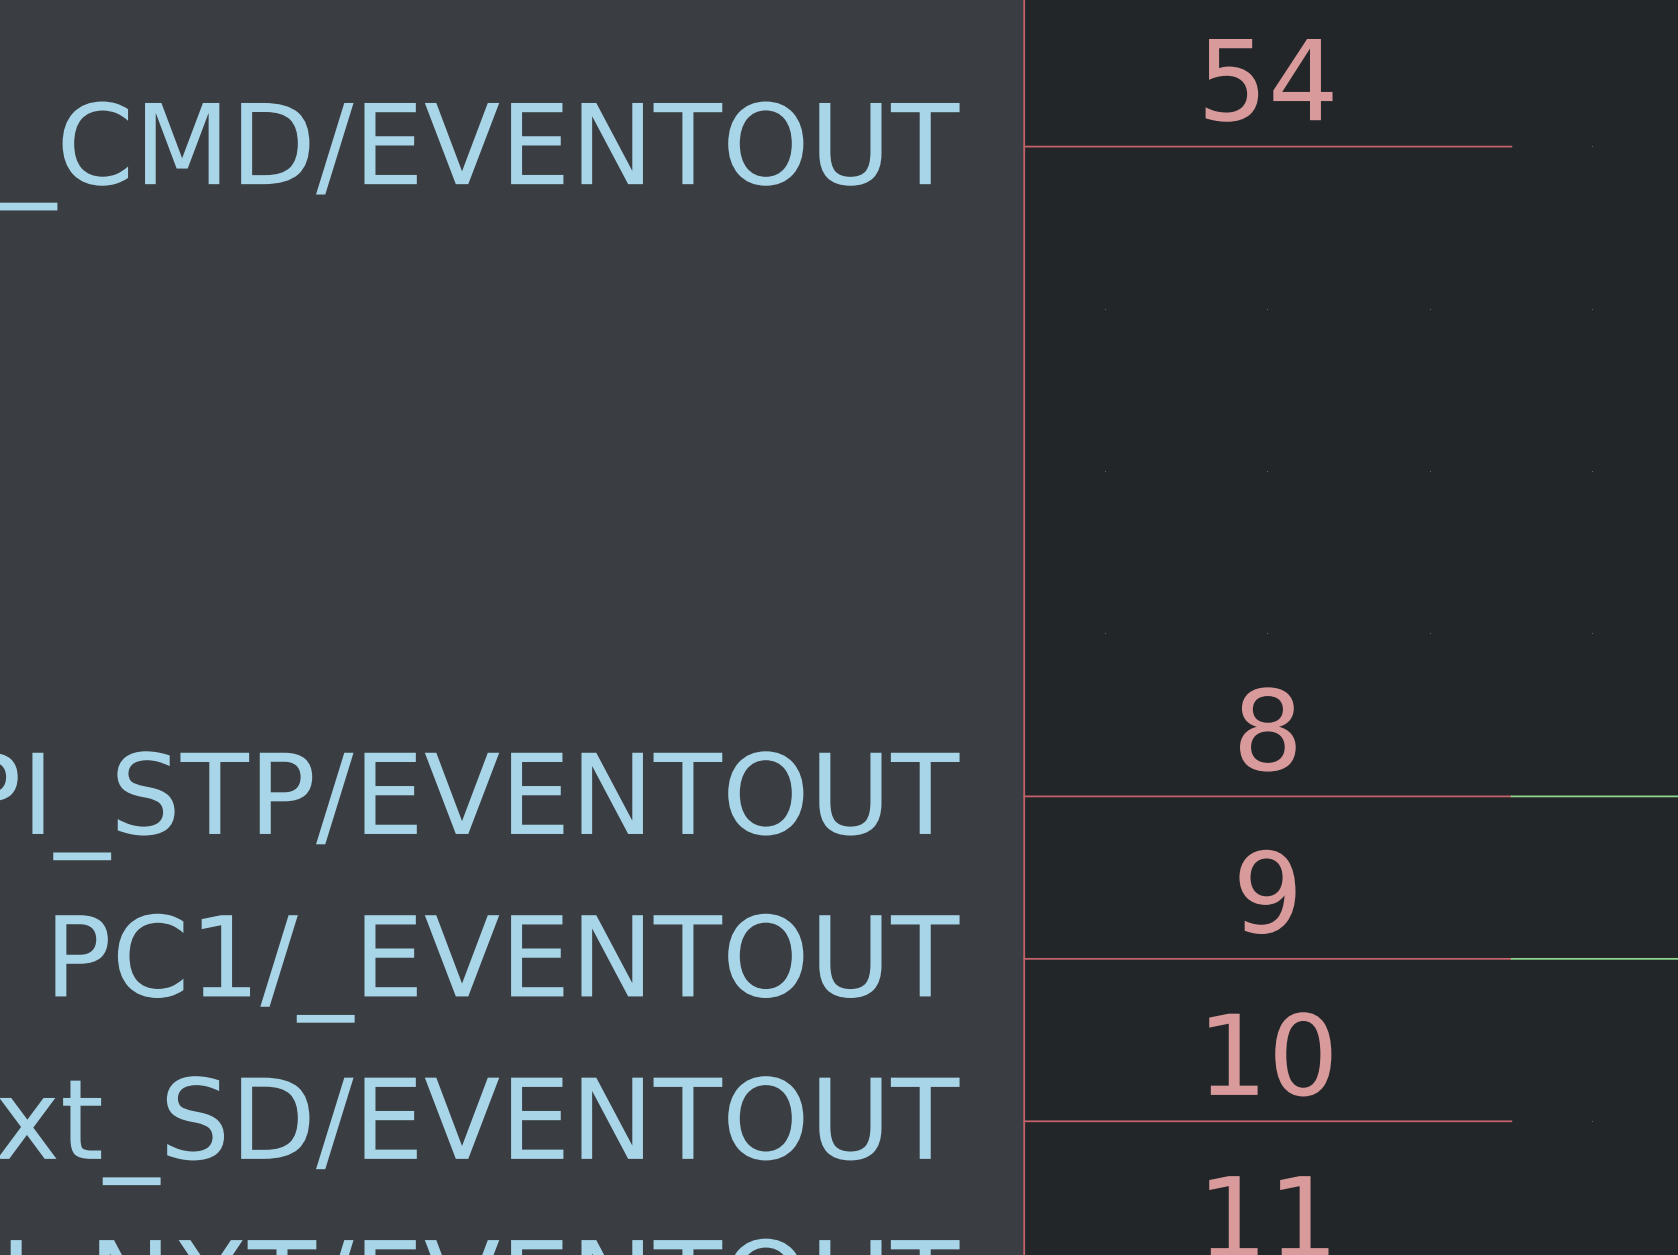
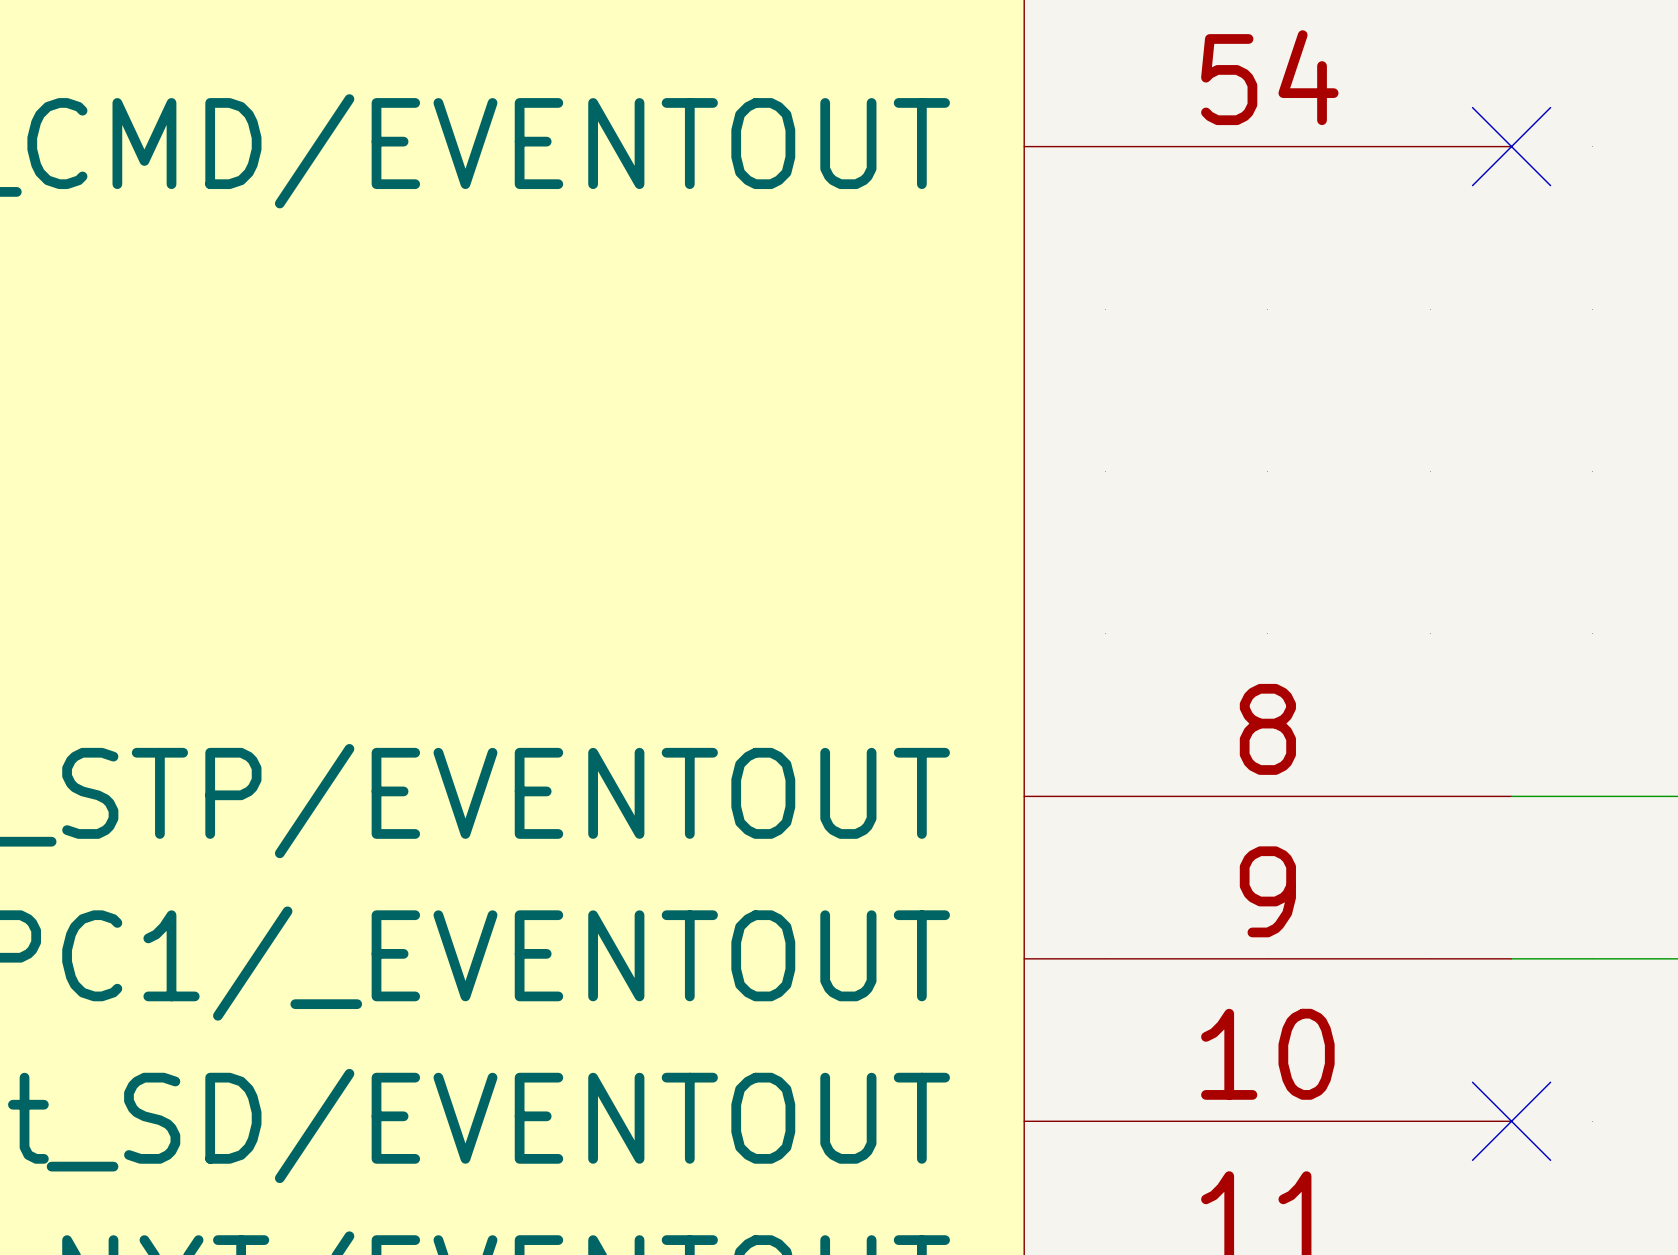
no-connect mark: none -> (1511, 146)
no-connect mark: none -> (1511, 1121)

